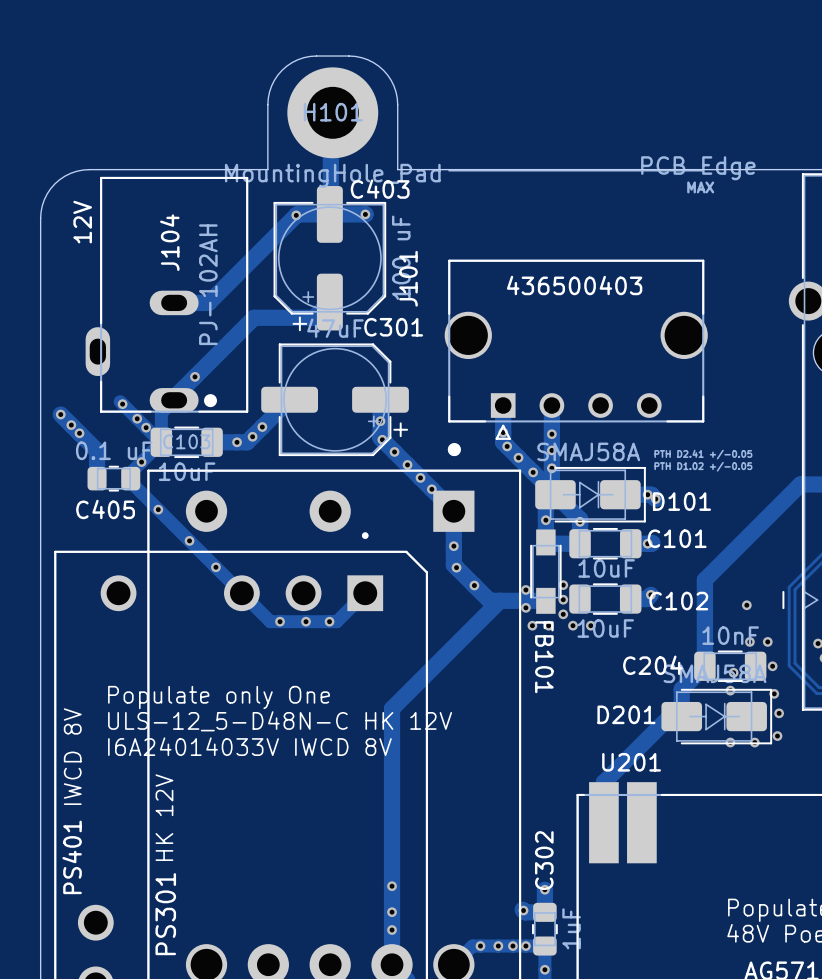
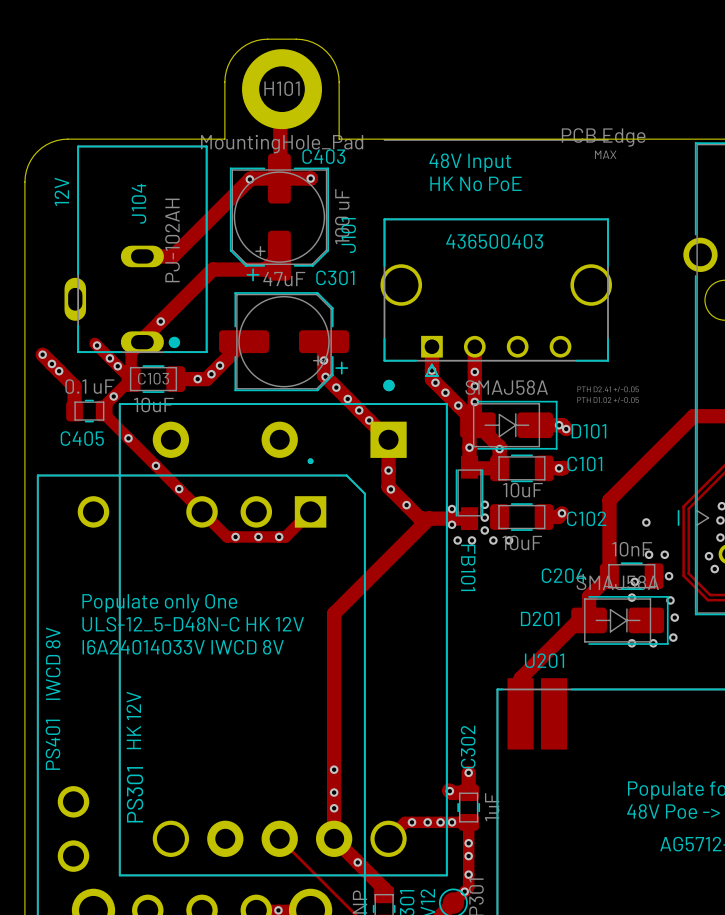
text: none -> 48V Input (470, 162)
text: none -> HK No PoE (475, 183)

